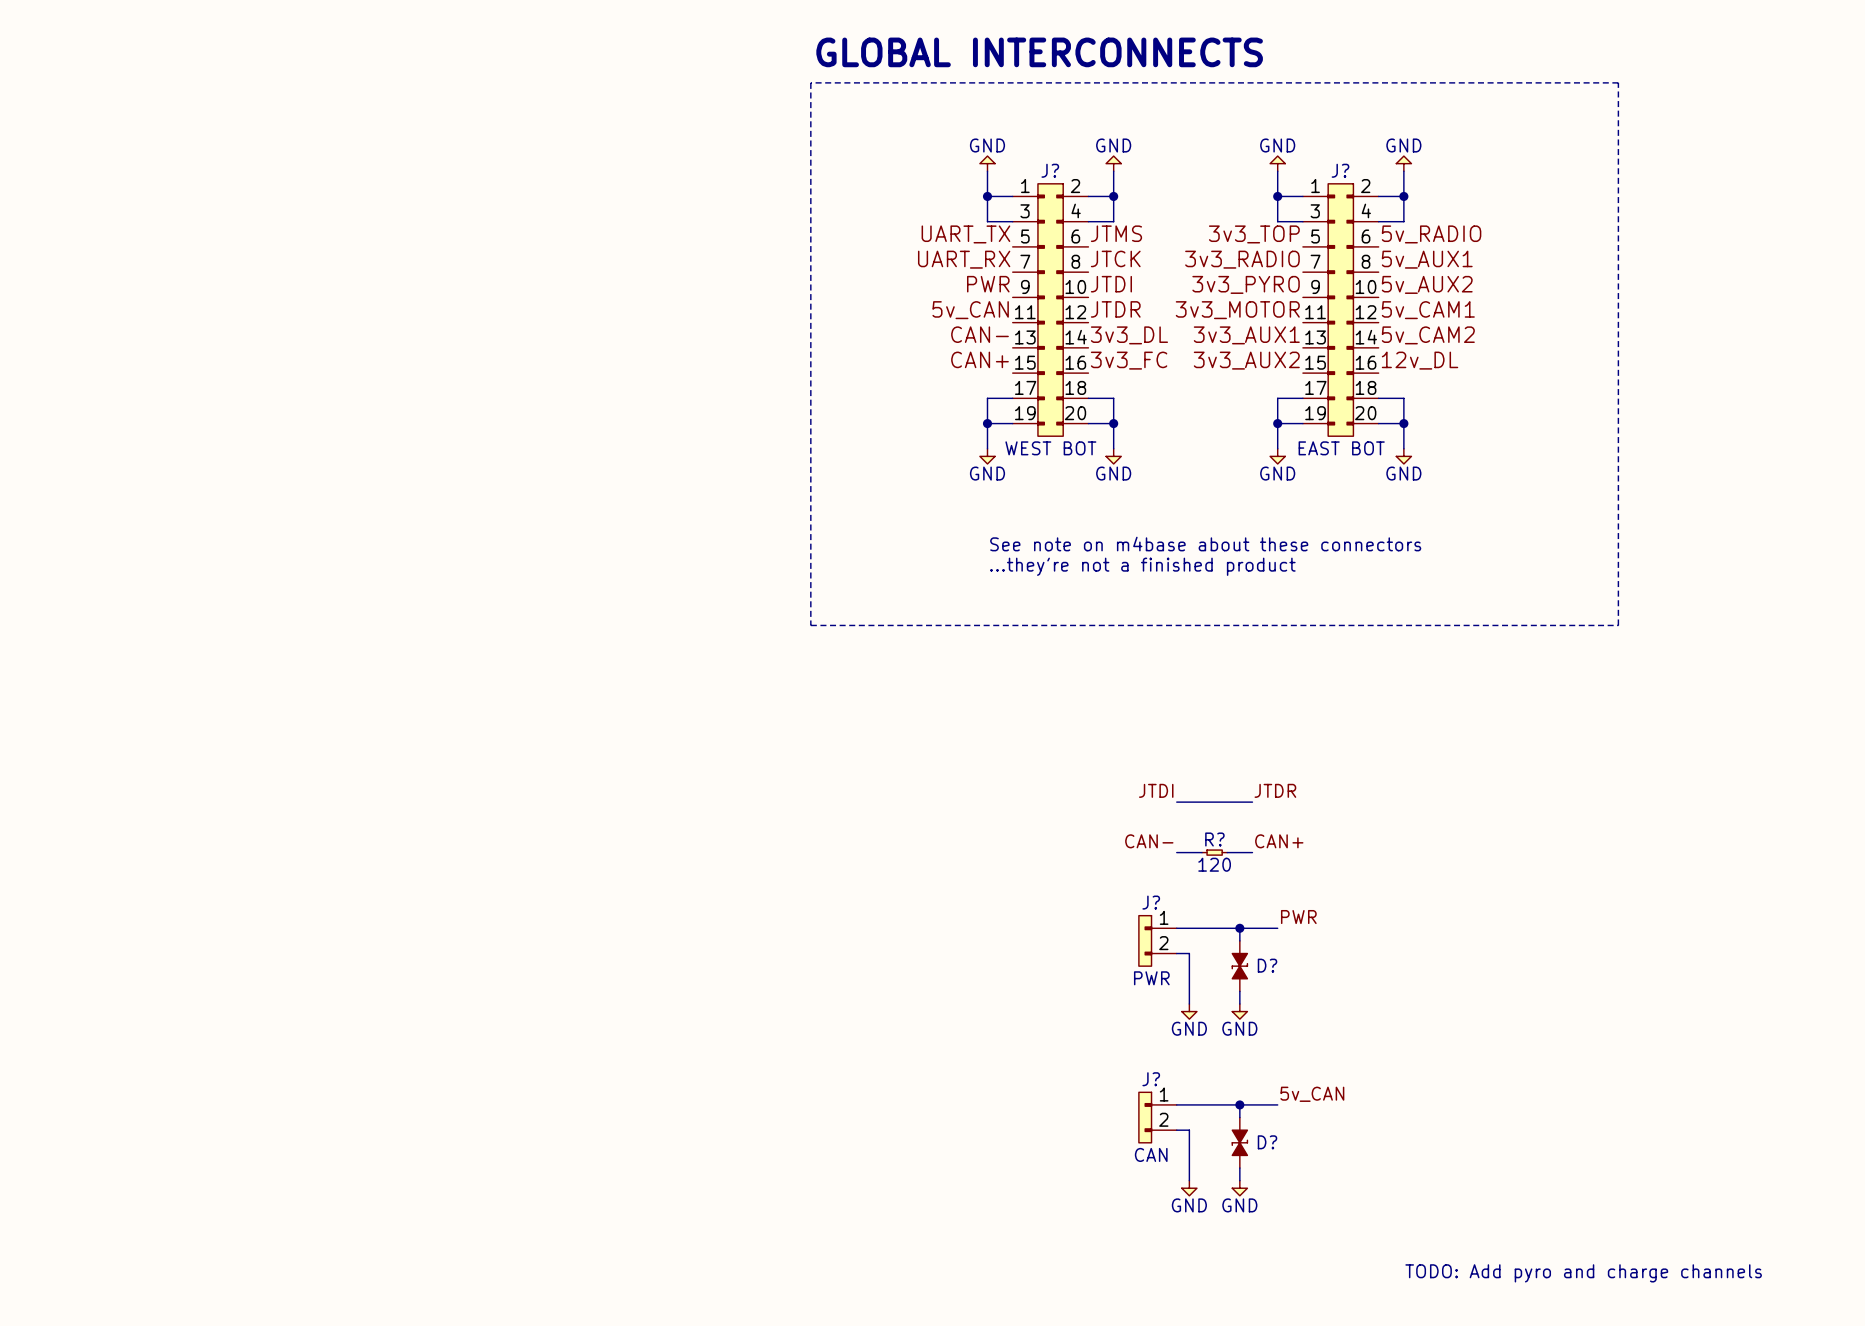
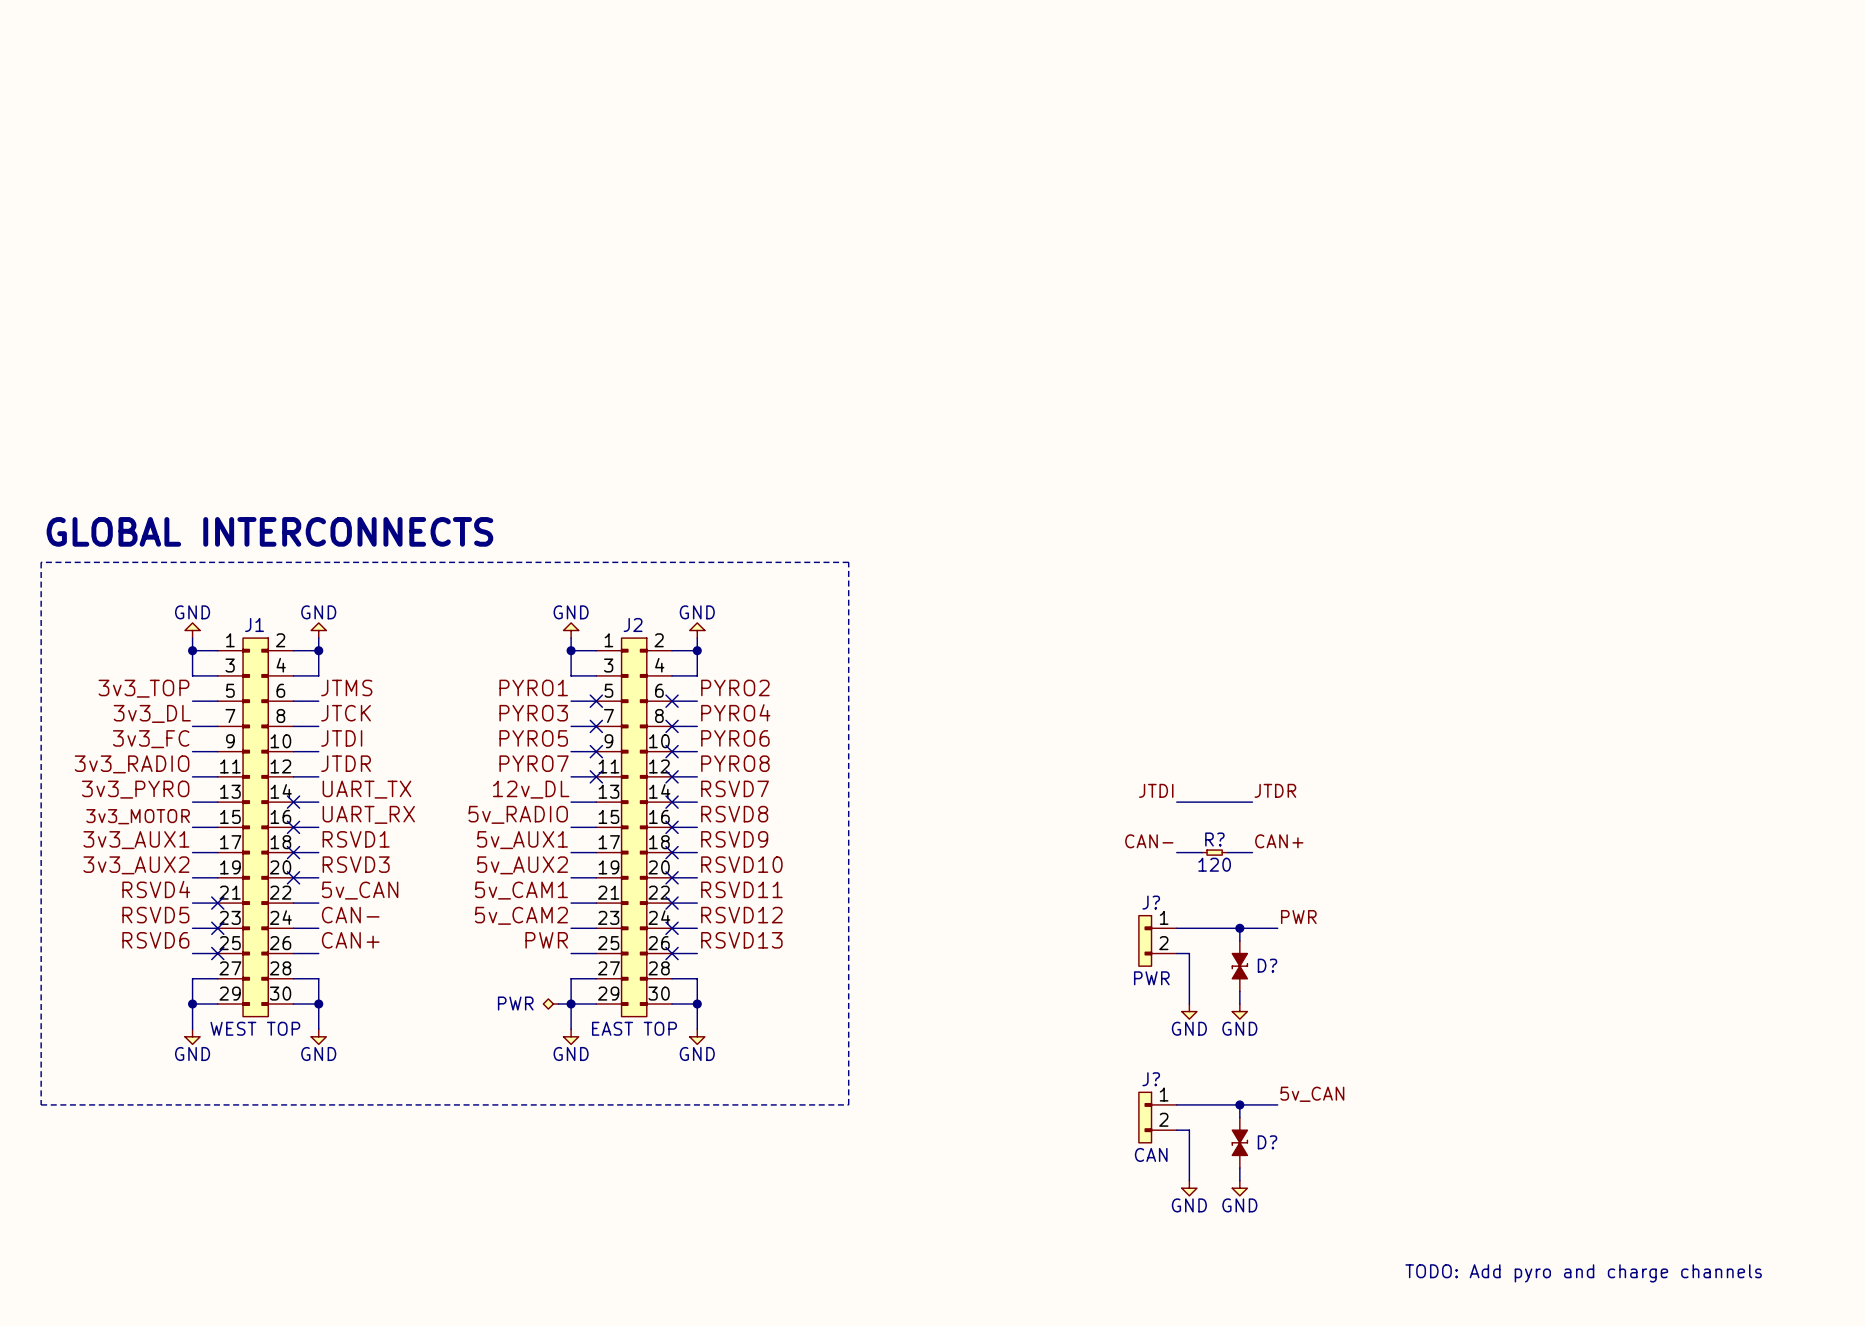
text: GLOBAL INTERCONNECTS (1039, 52) -> none
line: (810, 82) (1618, 82) (1618, 625) (810, 625) (810, 82) -> none
power symbol: GND (987, 163) -> none
power symbol: GND (1113, 163) -> none
power symbol: GND (1277, 163) -> none
power symbol: GND (1403, 163) -> none
wire: (987, 171) (987, 221) (1012, 221) -> none
wire: (1113, 171) (1113, 221) (1088, 221) -> none
wire: (1277, 171) (1277, 221) (1302, 221) -> none
wire: (1403, 171) (1403, 221) (1378, 221) -> none
wire: (987, 196) (1012, 196) -> none
junction: (987, 196) -> none
wire: (1088, 196) (1113, 196) -> none
junction: (1113, 196) -> none
wire: (1277, 196) (1302, 196) -> none
junction: (1277, 196) -> none
wire: (1378, 196) (1403, 196) -> none
junction: (1403, 196) -> none
label: JTMS (1116, 233) -> none
label: UART_TX (965, 234) -> none
label: 3v3_TOP (1254, 234) -> none
label: 5v_RADIO (1431, 234) -> none
label: JTCK (1115, 258) -> none
label: UART_RX (964, 259) -> none
label: 3v3_RADIO (1242, 259) -> none
label: 5v_AUX1 (1427, 259) -> none
label: PWR (988, 284) -> none
label: JTDI (1111, 284) -> none
label: 3v3_PYRO (1246, 284) -> none
label: 5v_AUX2 (1427, 284) -> none
label: JTDR (1115, 309) -> none
label: 5v_CAN (970, 310) -> none
J?: WEST BOT (1050, 310) -> none
label: 3v3_MOTOR (1237, 310) -> none
J?: EAST BOT (1340, 310) -> none
label: 5v_CAM1 (1428, 310) -> none
label: CAN- (980, 334) -> none
label: 3v3_DL (1129, 335) -> none
label: 3v3_AUX1 (1246, 335) -> none
label: 5v_CAM2 (1428, 335) -> none
label: CAN+ (980, 359) -> none
label: 3v3_FC (1129, 360) -> none
label: 3v3_AUX2 (1246, 360) -> none
label: 12v_DL (1420, 360) -> none
wire: (1012, 398) (987, 398) (987, 448) -> none
wire: (1088, 398) (1113, 398) (1113, 448) -> none
wire: (1302, 398) (1277, 398) (1277, 448) -> none
wire: (1378, 398) (1403, 398) (1403, 448) -> none
wire: (987, 423) (1012, 423) -> none
junction: (987, 423) -> none
wire: (1088, 423) (1113, 423) -> none
junction: (1113, 423) -> none
wire: (1277, 423) (1302, 423) -> none
junction: (1277, 423) -> none
wire: (1378, 423) (1403, 423) -> none
junction: (1403, 423) -> none
power symbol: GND (987, 456) -> none
power symbol: GND (1113, 456) -> none
power symbol: GND (1277, 456) -> none
power symbol: GND (1403, 456) -> none
text: none -> GLOBAL INTERCONNECTS (269, 531)
text: See note on m4base about these connectors (1205, 544) -> none
line: none -> (41, 562) (848, 562) (848, 1104) (41, 1104) (41, 562)
text: ...they're not a finished product (1142, 566) -> none
power symbol: none -> GND (192, 630)
power symbol: none -> GND (318, 630)
power symbol: none -> GND (571, 630)
power symbol: none -> GND (697, 630)
wire: none -> (192, 638) (192, 675) (217, 675)
wire: none -> (318, 638) (318, 675) (293, 675)
wire: none -> (571, 638) (571, 675) (596, 675)
wire: none -> (697, 638) (697, 675) (672, 675)
wire: none -> (192, 650) (217, 650)
junction: none -> (192, 650)
wire: none -> (293, 650) (318, 650)
junction: none -> (318, 650)
wire: none -> (571, 650) (596, 650)
junction: none -> (571, 650)
wire: none -> (672, 650) (697, 650)
junction: none -> (697, 650)
label: none -> JTMS (346, 687)
label: none -> PYRO1 (533, 687)
label: none -> PYRO2 (735, 687)
label: none -> 3v3_TOP (143, 688)
wire: none -> (192, 701) (217, 701)
wire: none -> (293, 701) (318, 701)
wire: none -> (571, 701) (596, 701)
no-connect mark: none -> (596, 701)
wire: none -> (672, 701) (697, 701)
no-connect mark: none -> (672, 701)
label: none -> PYRO4 (735, 712)
label: none -> 3v3_DL (152, 713)
label: none -> JTCK (346, 713)
label: none -> PYRO3 (533, 713)
wire: none -> (192, 726) (217, 726)
wire: none -> (293, 726) (318, 726)
wire: none -> (571, 726) (596, 726)
no-connect mark: none -> (596, 726)
wire: none -> (672, 726) (697, 726)
no-connect mark: none -> (672, 726)
label: none -> JTDI (341, 738)
label: none -> PYRO5 (533, 738)
label: none -> PYRO6 (735, 738)
label: none -> 3v3_FC (151, 739)
wire: none -> (192, 751) (217, 751)
wire: none -> (293, 751) (318, 751)
wire: none -> (571, 751) (596, 751)
no-connect mark: none -> (596, 751)
wire: none -> (672, 751) (697, 751)
no-connect mark: none -> (672, 751)
label: none -> JTDR (346, 763)
label: none -> PYRO7 (534, 763)
label: none -> PYRO8 (735, 763)
label: none -> 3v3_RADIO (132, 764)
wire: none -> (192, 776) (217, 776)
wire: none -> (293, 776) (318, 776)
wire: none -> (571, 776) (596, 776)
no-connect mark: none -> (596, 776)
wire: none -> (672, 776) (697, 776)
no-connect mark: none -> (672, 776)
label: none -> RSVD7 (735, 788)
label: none -> 3v3_PYRO (135, 789)
label: none -> UART_TX (366, 789)
label: none -> 12v_DL (531, 789)
wire: none -> (192, 802) (217, 802)
wire: none -> (293, 802) (318, 802)
no-connect mark: none -> (293, 802)
wire: none -> (571, 802) (596, 802)
wire: none -> (672, 802) (697, 802)
no-connect mark: none -> (672, 802)
label: none -> UART_RX (368, 814)
label: none -> 5v_RADIO (518, 814)
label: none -> RSVD8 (734, 814)
label: none -> 3v3_MOTOR (138, 816)
wire: none -> (192, 827) (217, 827)
J1: none -> WEST TOP (255, 827)
wire: none -> (293, 827) (318, 827)
no-connect mark: none -> (293, 827)
wire: none -> (571, 827) (596, 827)
J2: none -> EAST TOP (634, 827)
wire: none -> (672, 827) (697, 827)
no-connect mark: none -> (672, 827)
label: none -> RSVD1 (356, 839)
label: none -> RSVD9 (734, 839)
label: none -> 3v3_AUX1 (136, 840)
label: none -> 5v_AUX1 (522, 840)
wire: none -> (192, 852) (217, 852)
wire: none -> (293, 852) (318, 852)
no-connect mark: none -> (293, 852)
wire: none -> (571, 852) (596, 852)
wire: none -> (672, 852) (697, 852)
no-connect mark: none -> (672, 852)
label: none -> RSVD3 (356, 864)
label: none -> RSVD10 (741, 864)
label: none -> 3v3_AUX2 (136, 865)
label: none -> 5v_AUX2 (522, 865)
wire: none -> (192, 877) (217, 877)
wire: none -> (293, 877) (318, 877)
no-connect mark: none -> (293, 877)
wire: none -> (571, 877) (596, 877)
wire: none -> (672, 877) (697, 877)
no-connect mark: none -> (672, 877)
label: none -> RSVD4 (156, 889)
label: none -> RSVD11 (741, 889)
label: none -> 5v_CAN (360, 890)
label: none -> 5v_CAM1 (521, 890)
wire: none -> (192, 903) (217, 903)
no-connect mark: none -> (217, 903)
wire: none -> (293, 903) (318, 903)
wire: none -> (571, 903) (596, 903)
wire: none -> (672, 903) (697, 903)
no-connect mark: none -> (672, 903)
label: none -> RSVD5 (155, 915)
label: none -> CAN- (350, 915)
label: none -> 5v_CAM2 (521, 915)
label: none -> RSVD12 (741, 915)
wire: none -> (192, 928) (217, 928)
no-connect mark: none -> (217, 928)
wire: none -> (293, 928) (318, 928)
wire: none -> (571, 928) (596, 928)
wire: none -> (672, 928) (697, 928)
no-connect mark: none -> (672, 928)
label: none -> RSVD6 (155, 940)
label: none -> CAN+ (350, 940)
label: none -> PWR (546, 940)
label: none -> RSVD13 (741, 940)
wire: none -> (192, 953) (217, 953)
no-connect mark: none -> (217, 953)
wire: none -> (293, 953) (318, 953)
wire: none -> (571, 953) (596, 953)
wire: none -> (672, 953) (697, 953)
no-connect mark: none -> (672, 953)
wire: none -> (217, 978) (192, 978) (192, 1029)
wire: none -> (293, 978) (318, 978) (318, 1029)
wire: none -> (596, 978) (571, 978) (571, 1029)
wire: none -> (672, 978) (697, 978) (697, 1029)
wire: none -> (192, 1004) (217, 1004)
junction: none -> (192, 1004)
wire: none -> (293, 1004) (318, 1004)
junction: none -> (318, 1004)
power symbol: none -> PWR (550, 1004)
wire: none -> (558, 1004) (596, 1004)
junction: none -> (571, 1004)
wire: none -> (672, 1004) (697, 1004)
junction: none -> (697, 1004)
power symbol: none -> GND (192, 1036)
power symbol: none -> GND (318, 1036)
power symbol: none -> GND (571, 1036)
power symbol: none -> GND (697, 1036)

